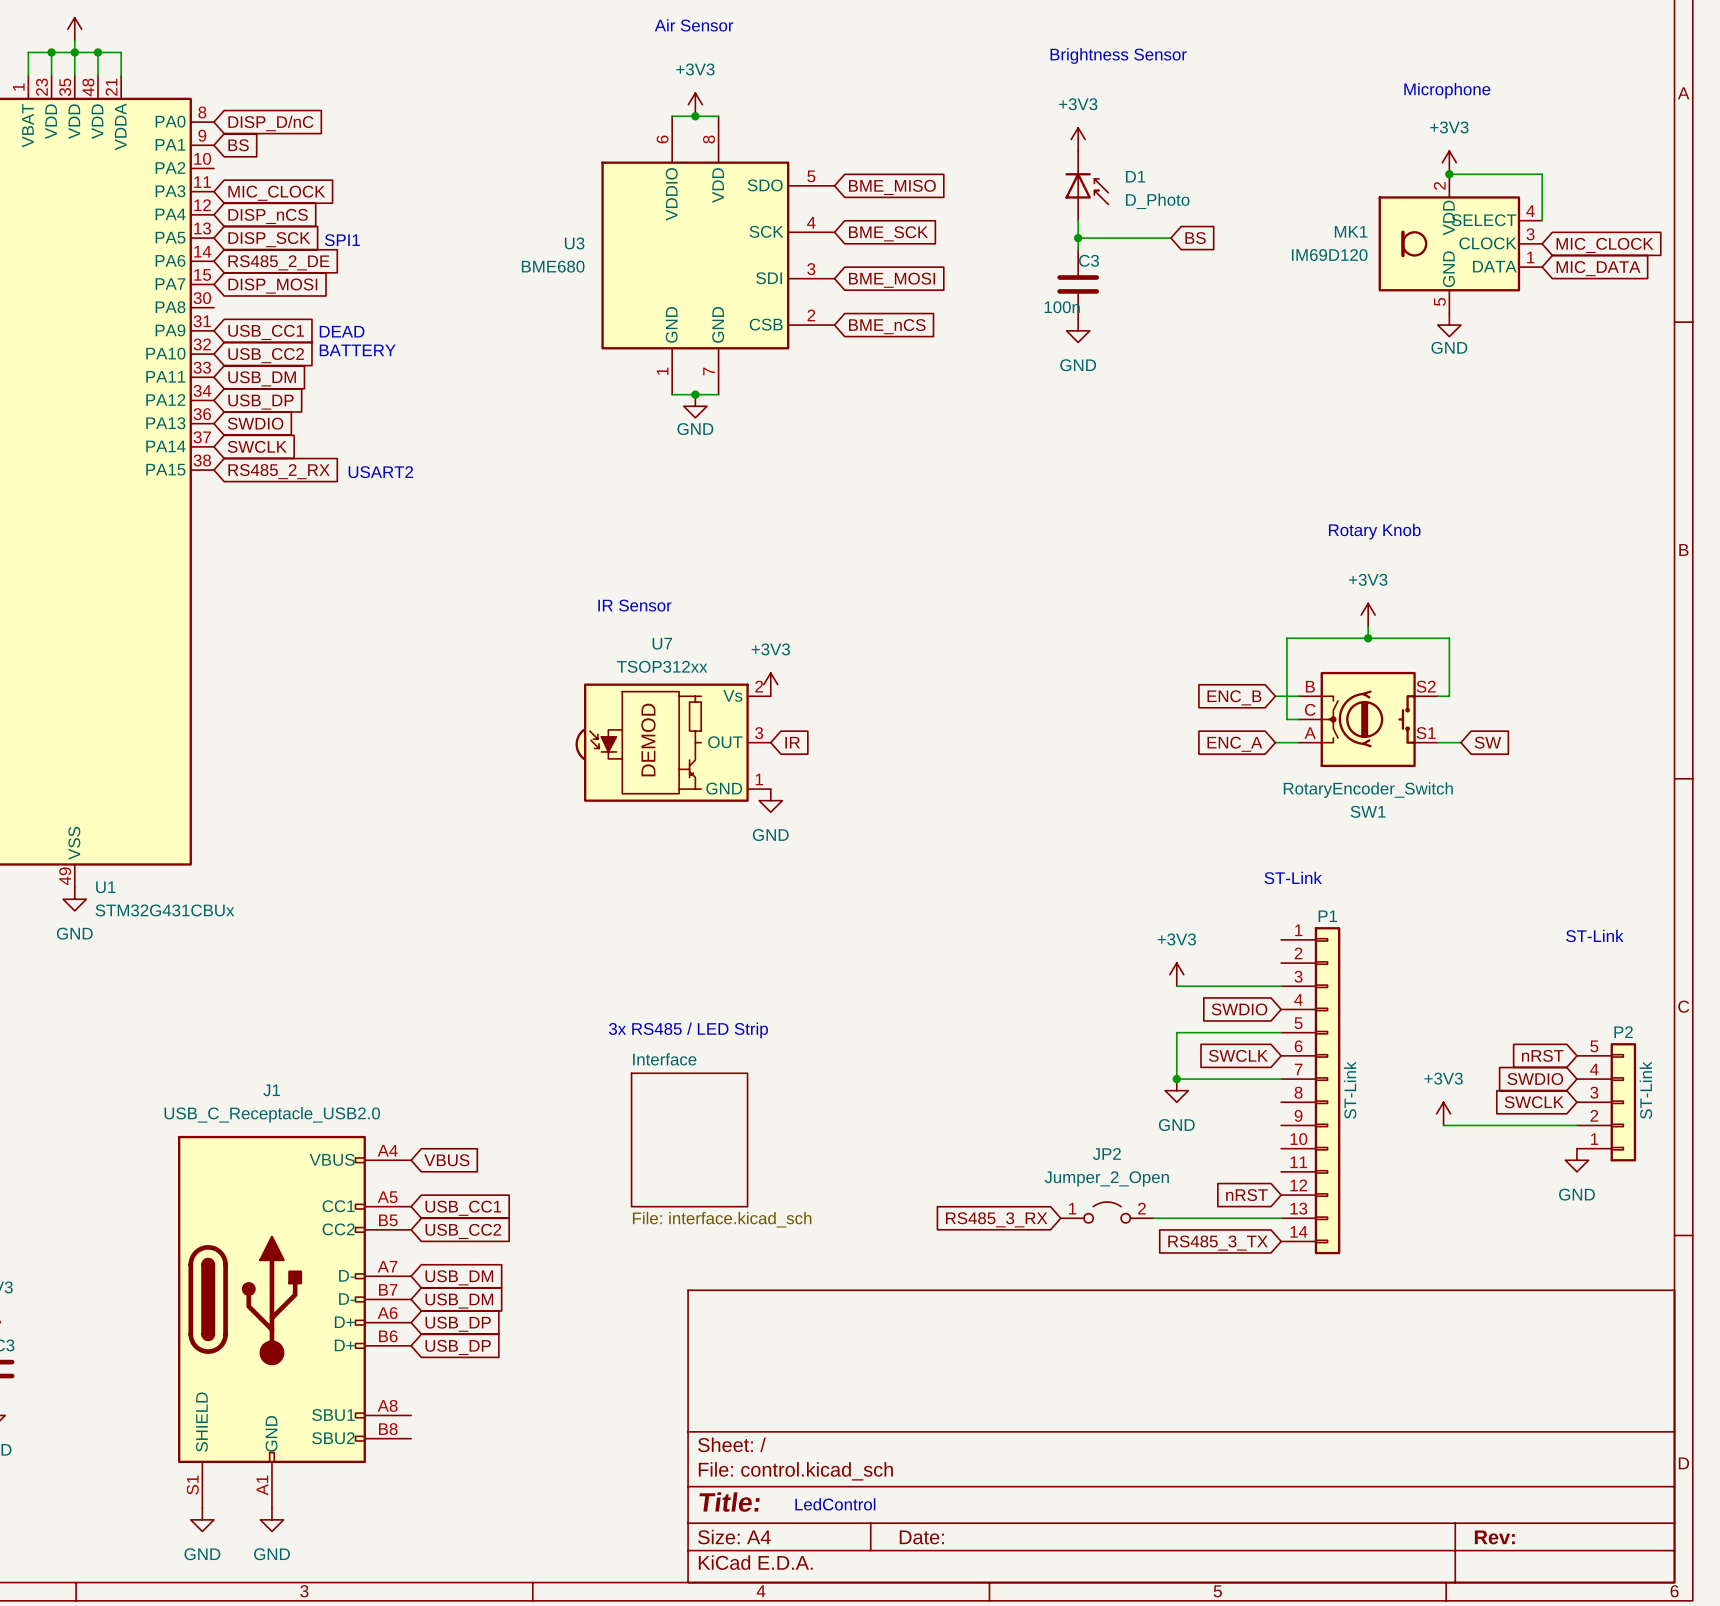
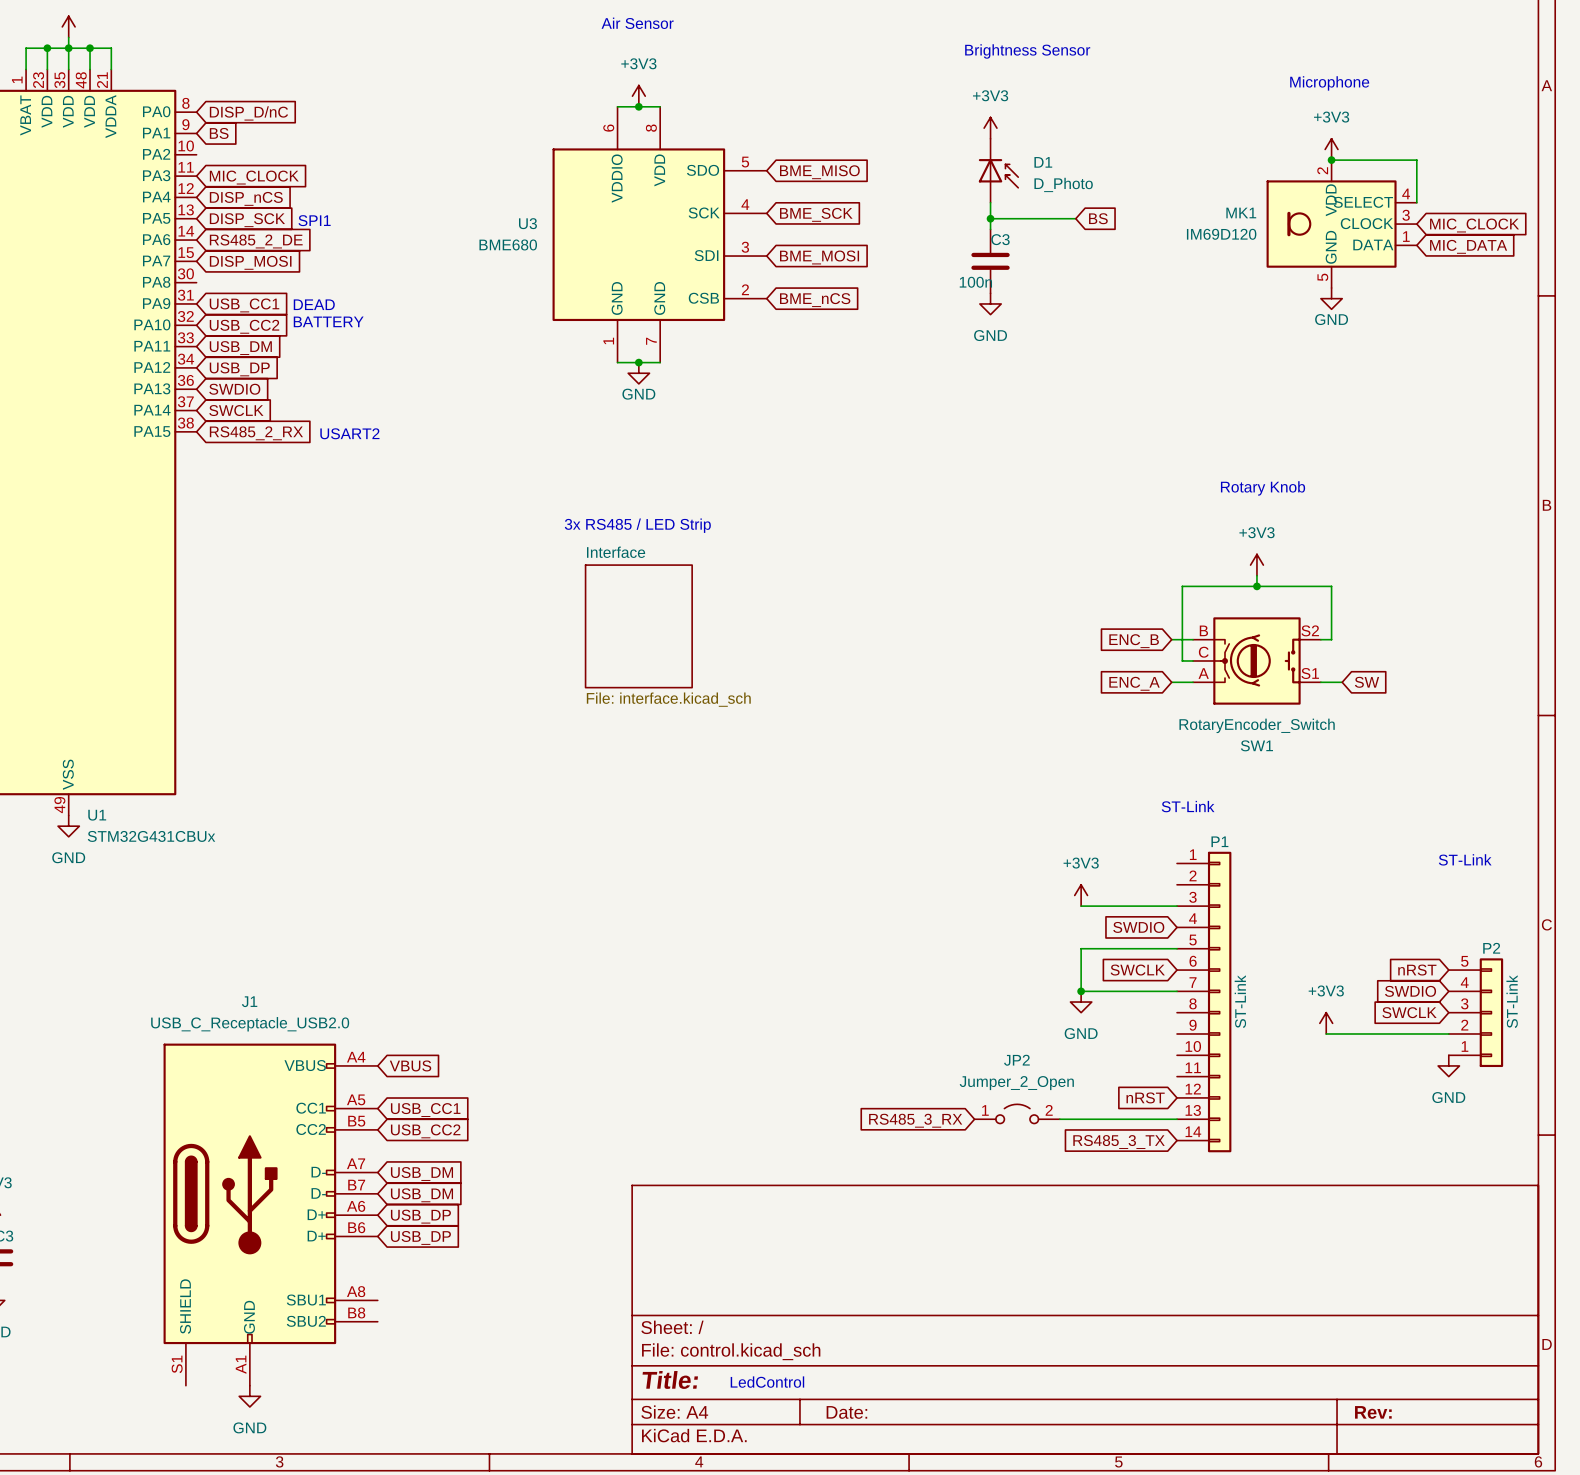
text: none -> 3x RS485 / LED Strip (637, 525)
text: IR Sensor (634, 605) -> none
sheet Interface: none -> File: interface.kicad_sch (638, 626)
power symbol: +3V3 (770, 684) -> none
U7: TSOP312xx (673, 742) -> none
global label: IR (792, 742) -> none
power symbol: GND (770, 800) -> none
text: 3x RS485 / LED Strip (688, 1030) -> none
sheet Interface: File: interface.kicad_sch (689, 1139) -> none
power symbol: GND (202, 1519) -> none

